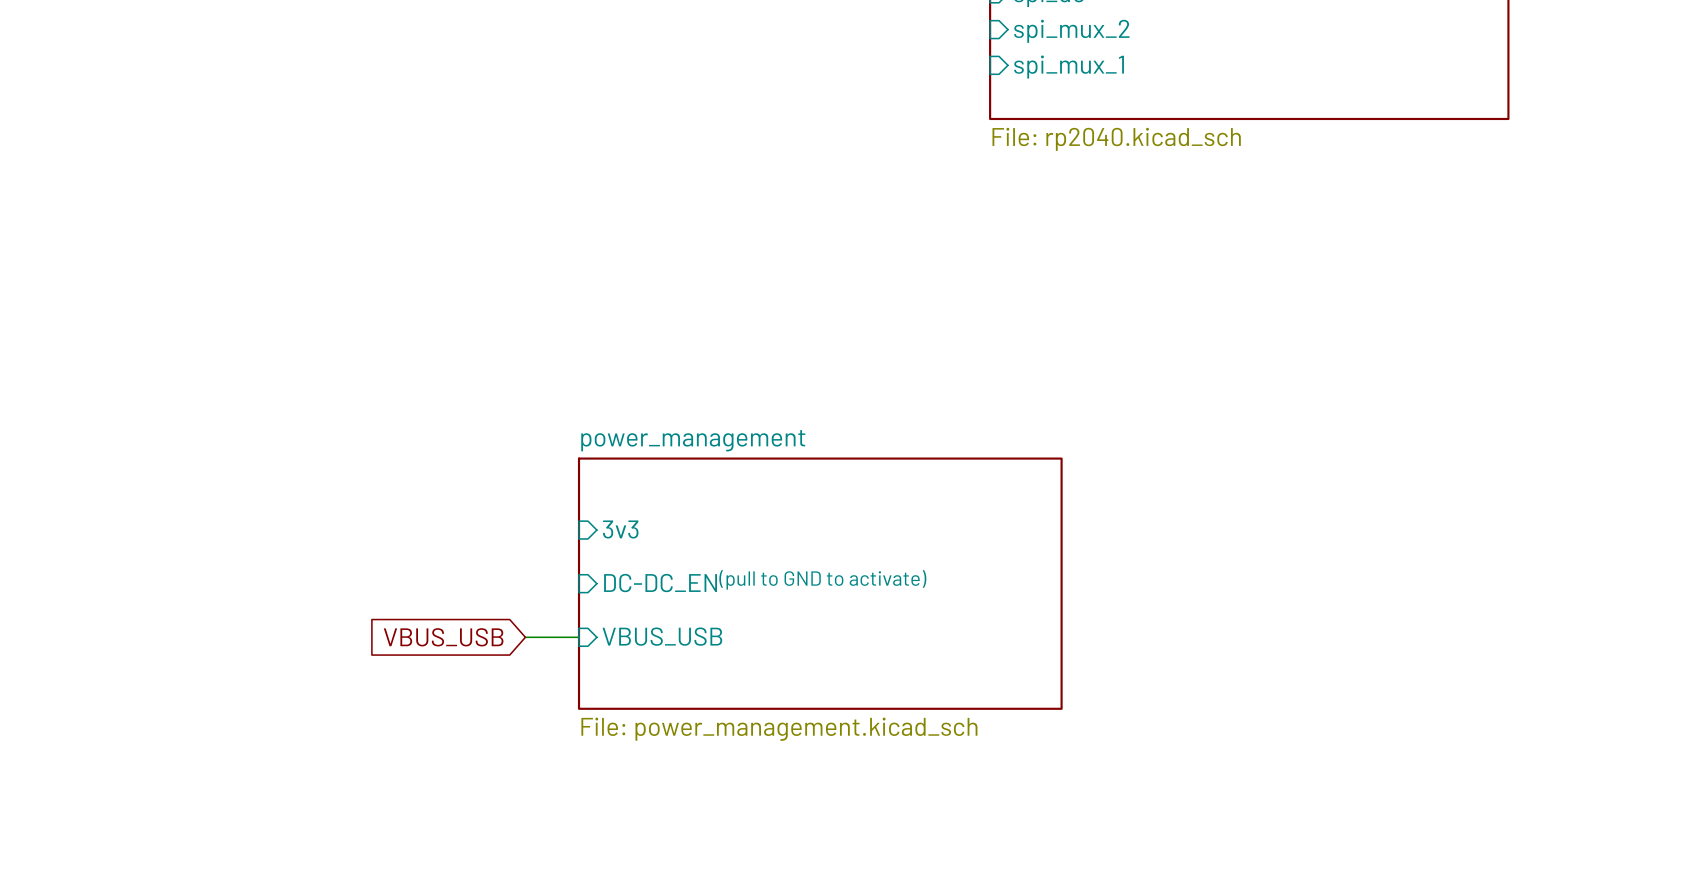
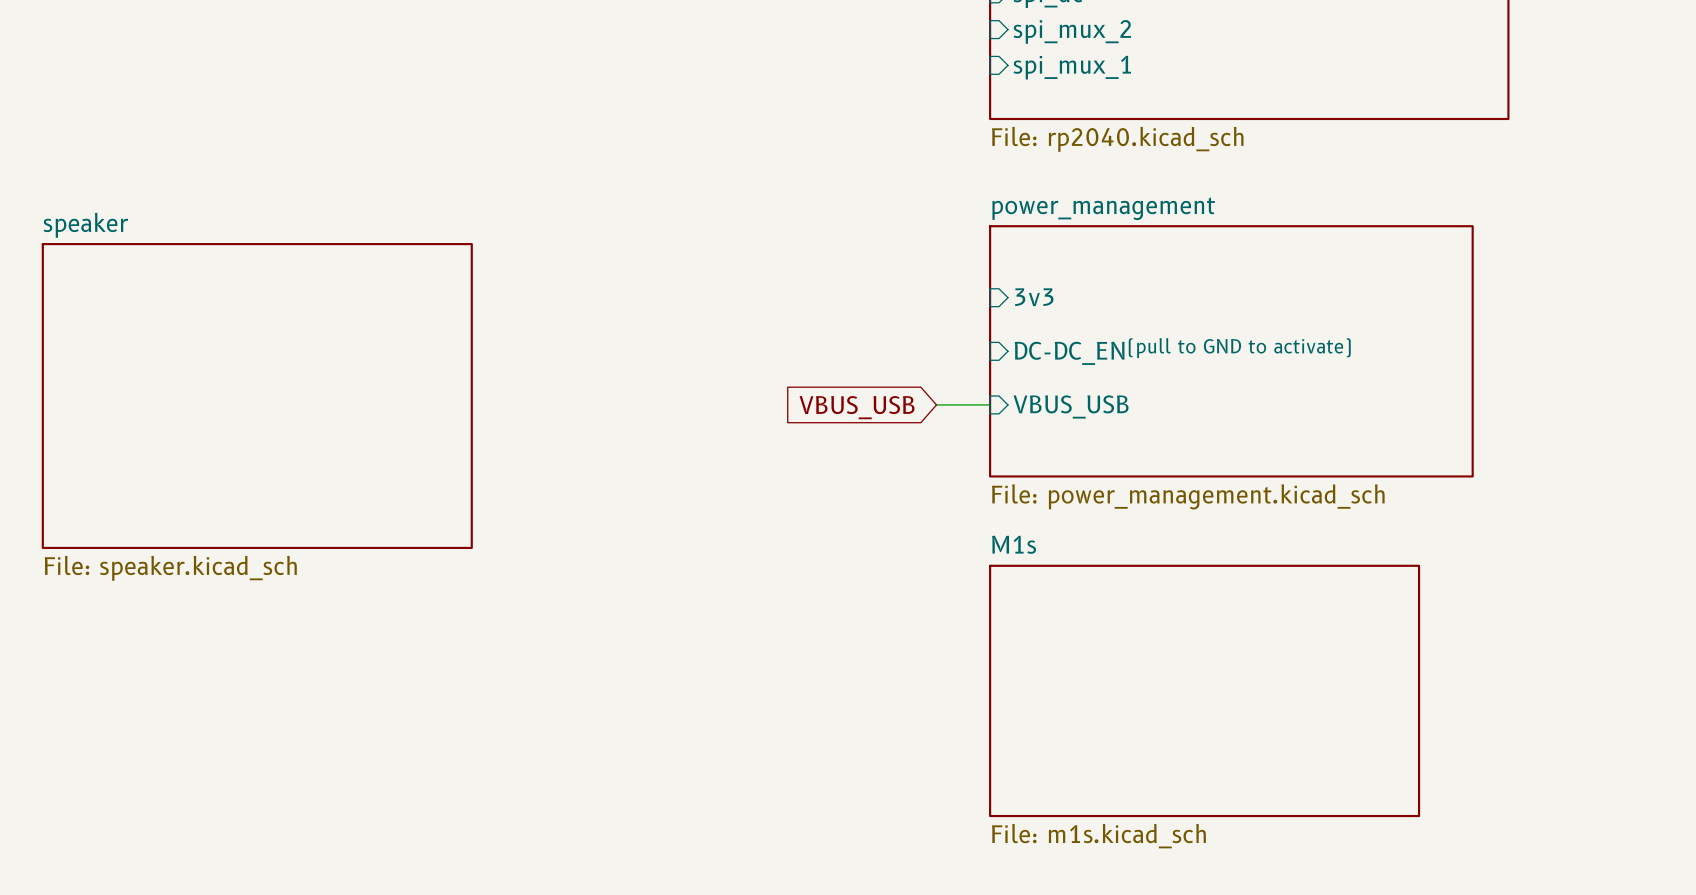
sheet pin: none -> 3v3 (1034, 297)
sheet pin: none -> DC-DC_EN(pull to GND to activate) (1182, 351)
sheet power_management: none -> File: power_management.kicad_sch (1231, 351)
sheet speaker: none -> File: speaker.kicad_sch (257, 396)
global label: none -> VBUS_USB (857, 407)
wire: none -> (936, 404) (990, 404)
sheet pin: none -> VBUS_USB (1071, 406)
sheet pin: 3v3 (620, 529) -> none
sheet pin: DC-DC_EN(pull to GND to activate) (765, 581) -> none
sheet power_management: File: power_management.kicad_sch (820, 583) -> none
sheet pin: VBUS_USB (662, 636) -> none
global label: VBUS_USB (443, 637) -> none
wire: (525, 637) (579, 637) -> none
sheet M1s: none -> File: m1s.kicad_sch (1204, 690)

